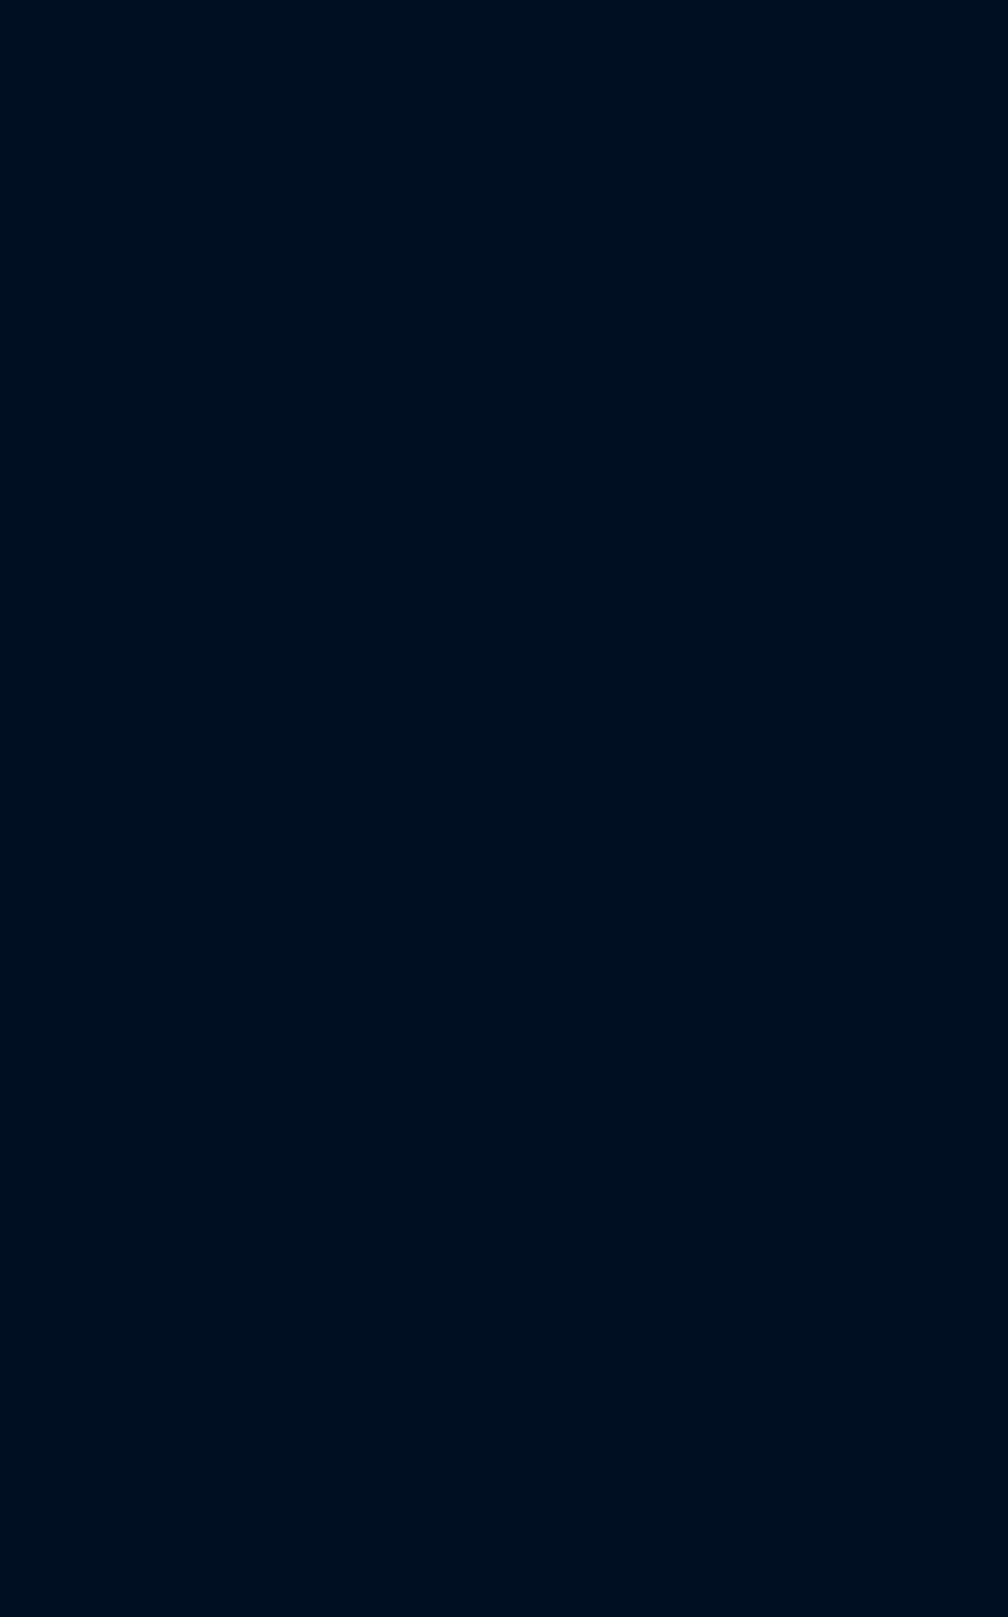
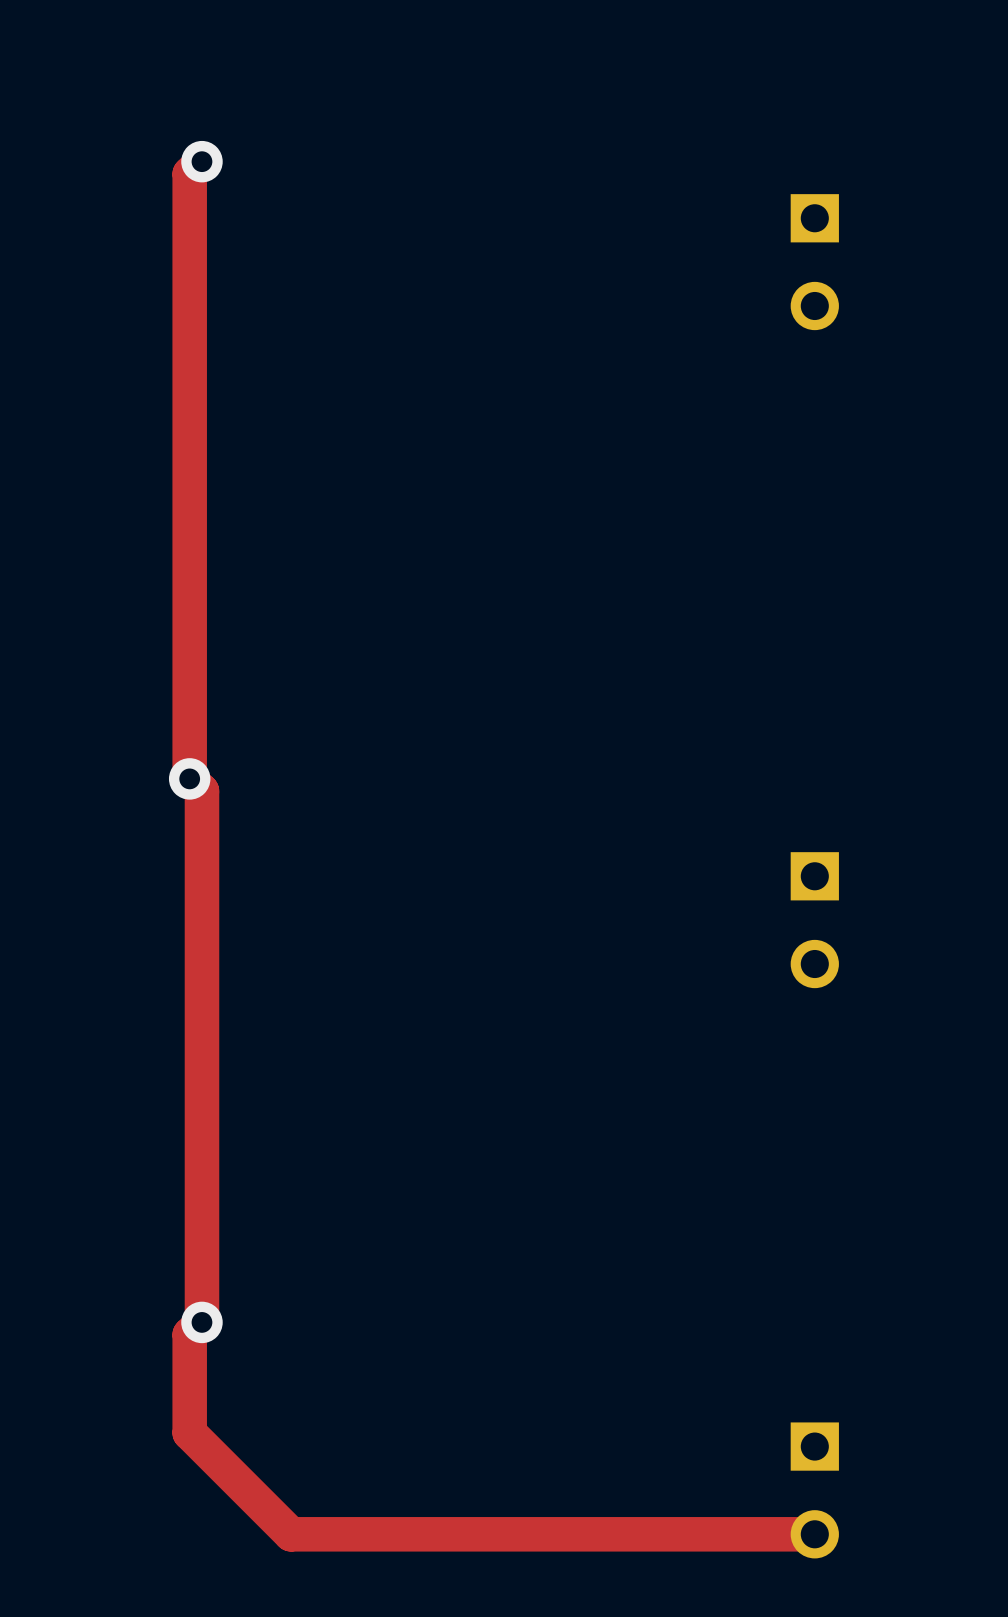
track: none -> (201, 161) (189, 173) (189, 778) (201, 791) (201, 1322) (189, 1334) (189, 1432) (291, 1534) (814, 1534)
via: none -> (201, 161)
part: none -> (814, 262)
via: none -> (189, 778)
part: none -> (814, 920)
via: none -> (201, 1322)
part: none -> (814, 1490)

